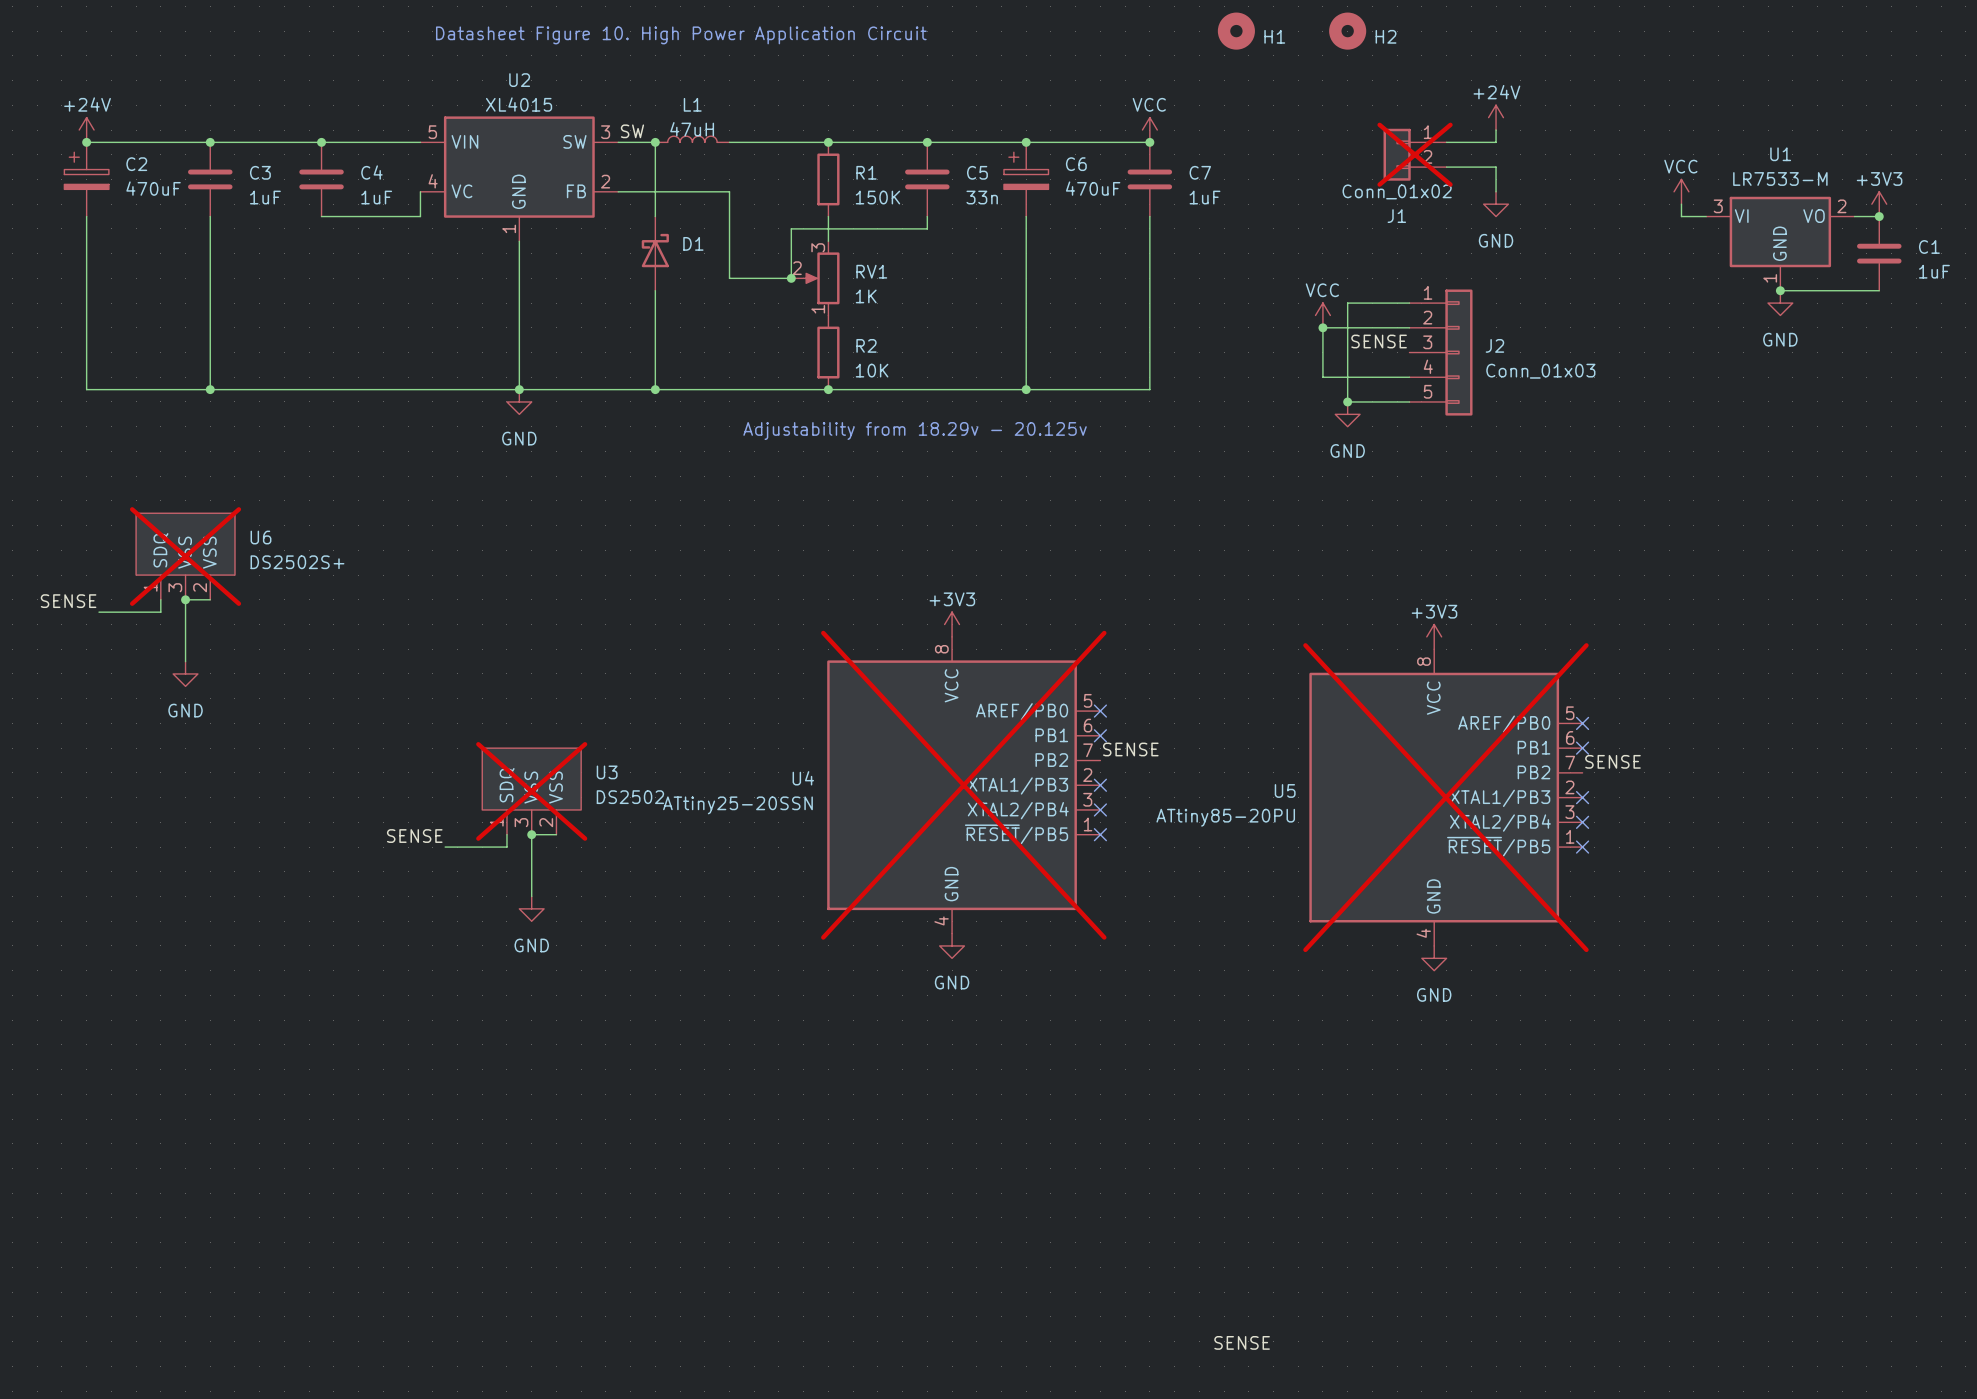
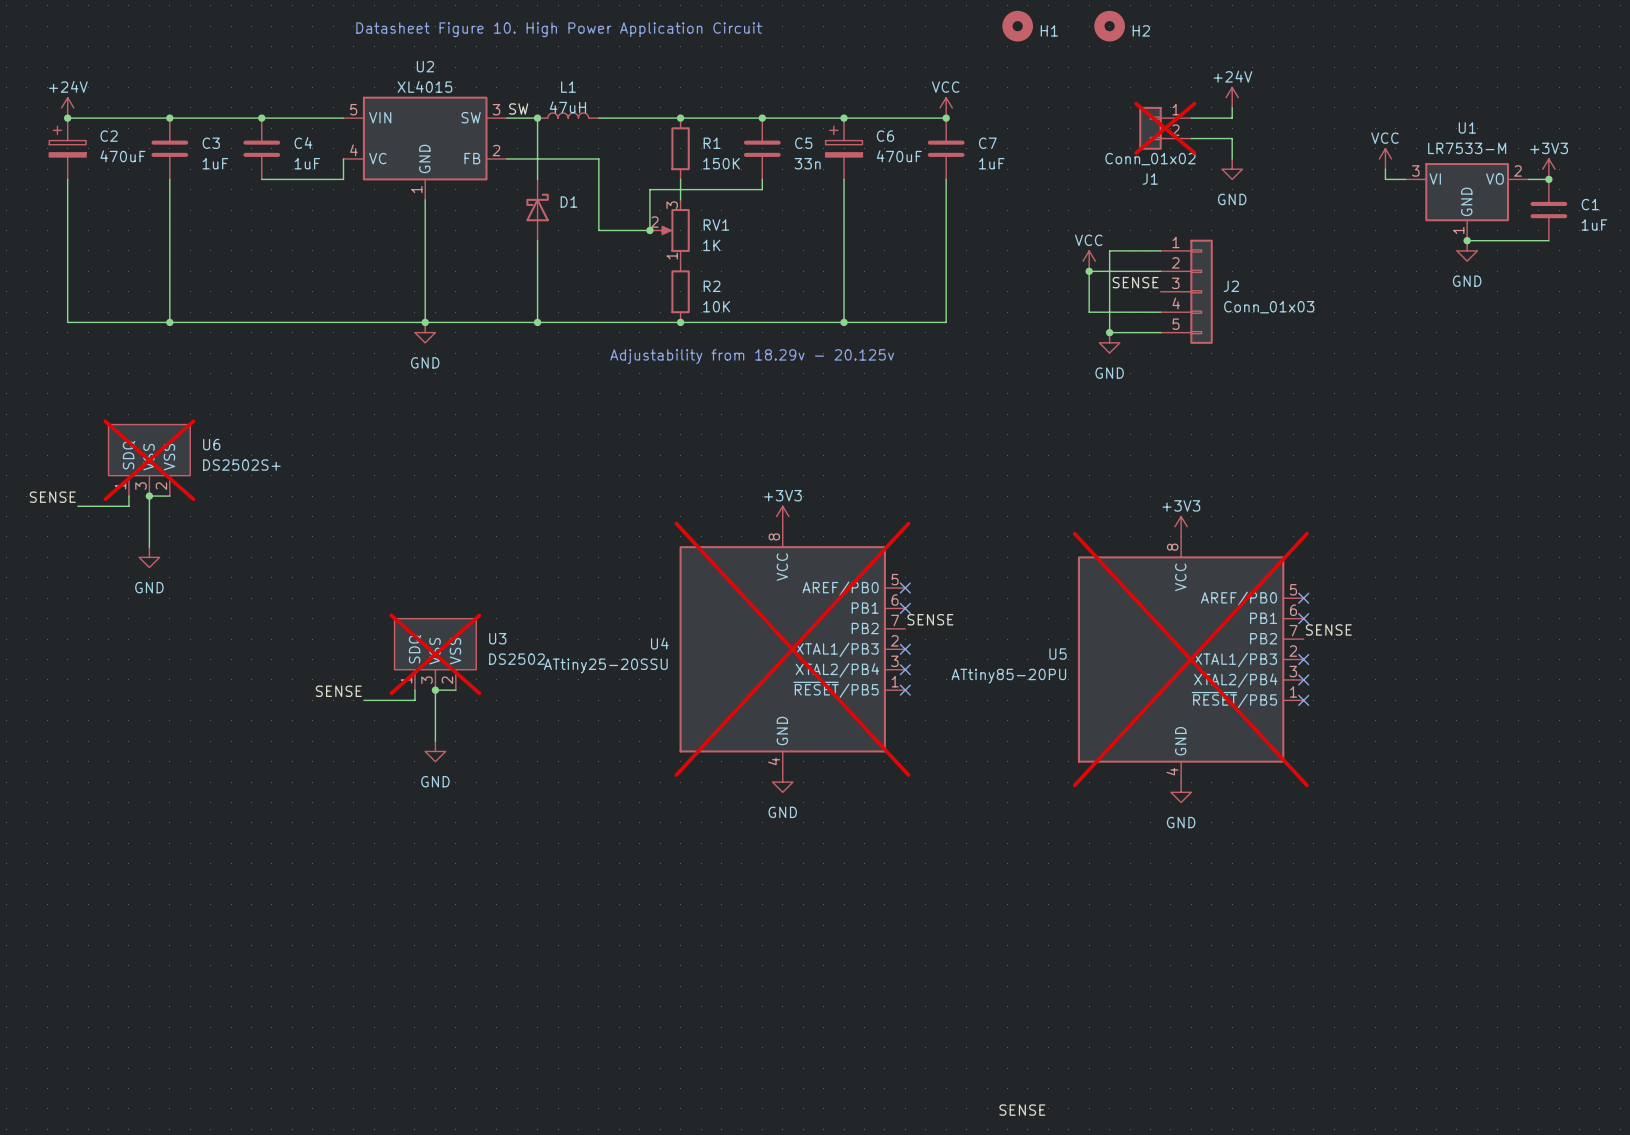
U4 value: ATtiny25-20SSN (737, 805) -> ATtiny25-20SSU (605, 665)

